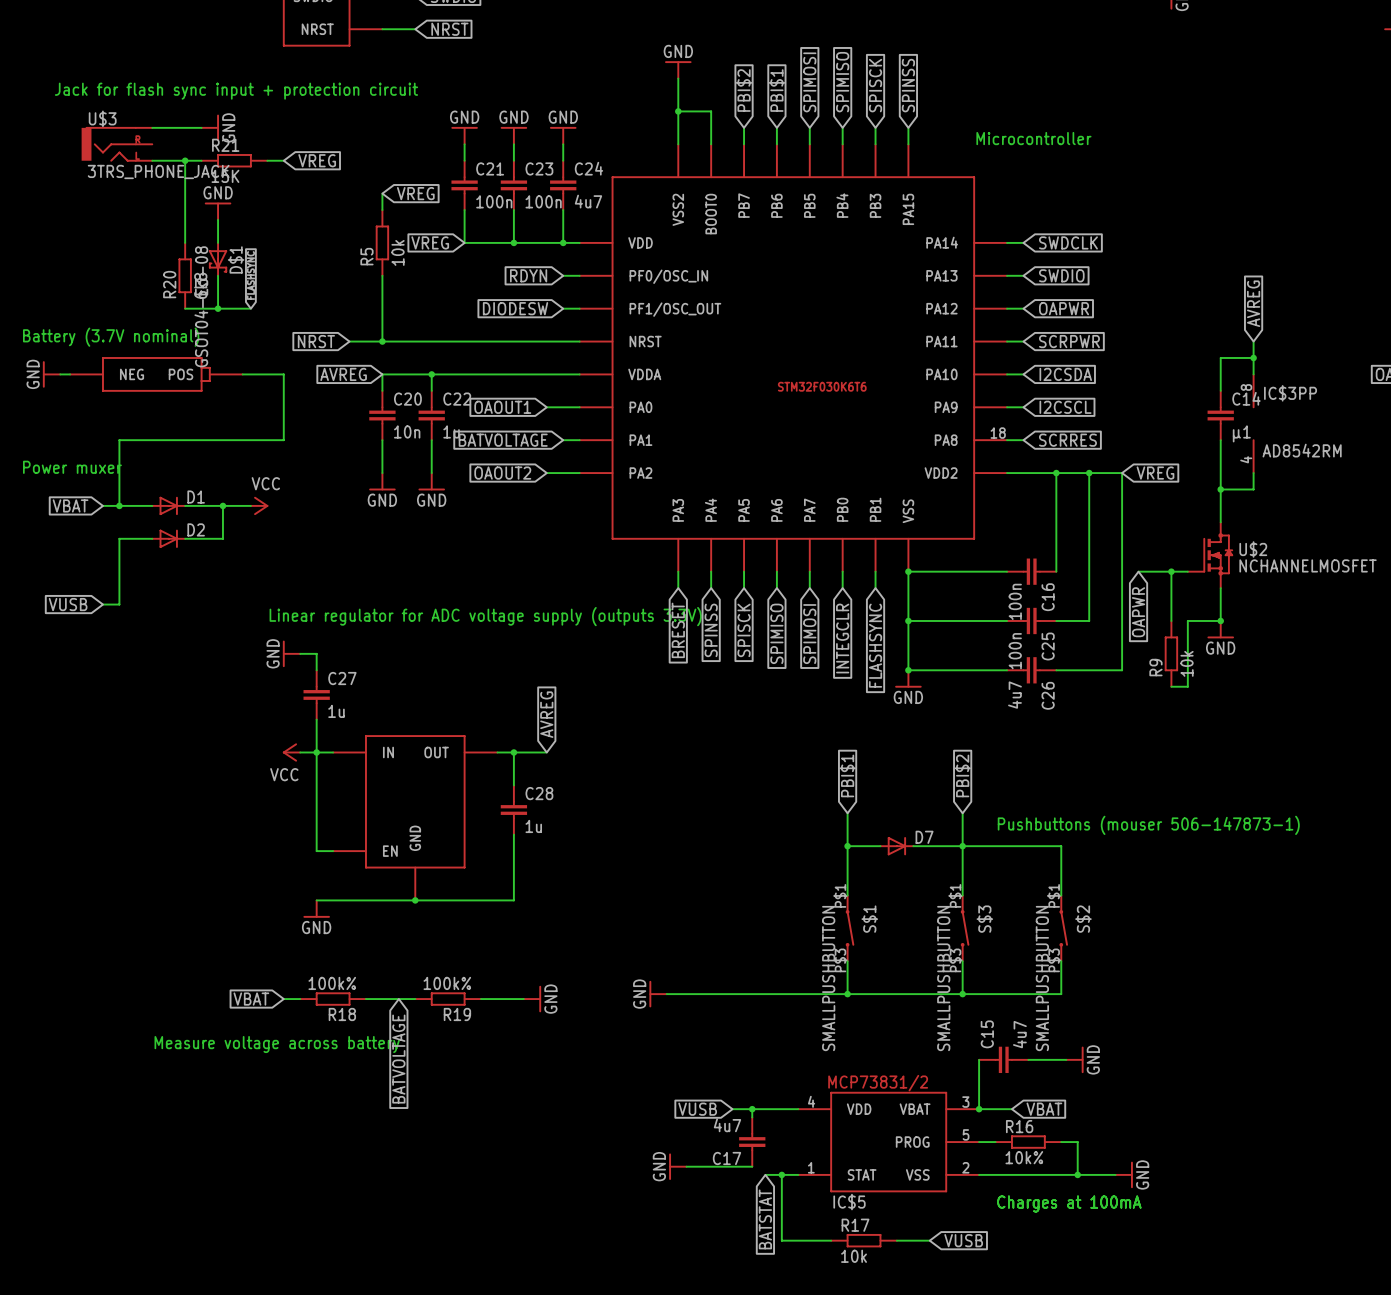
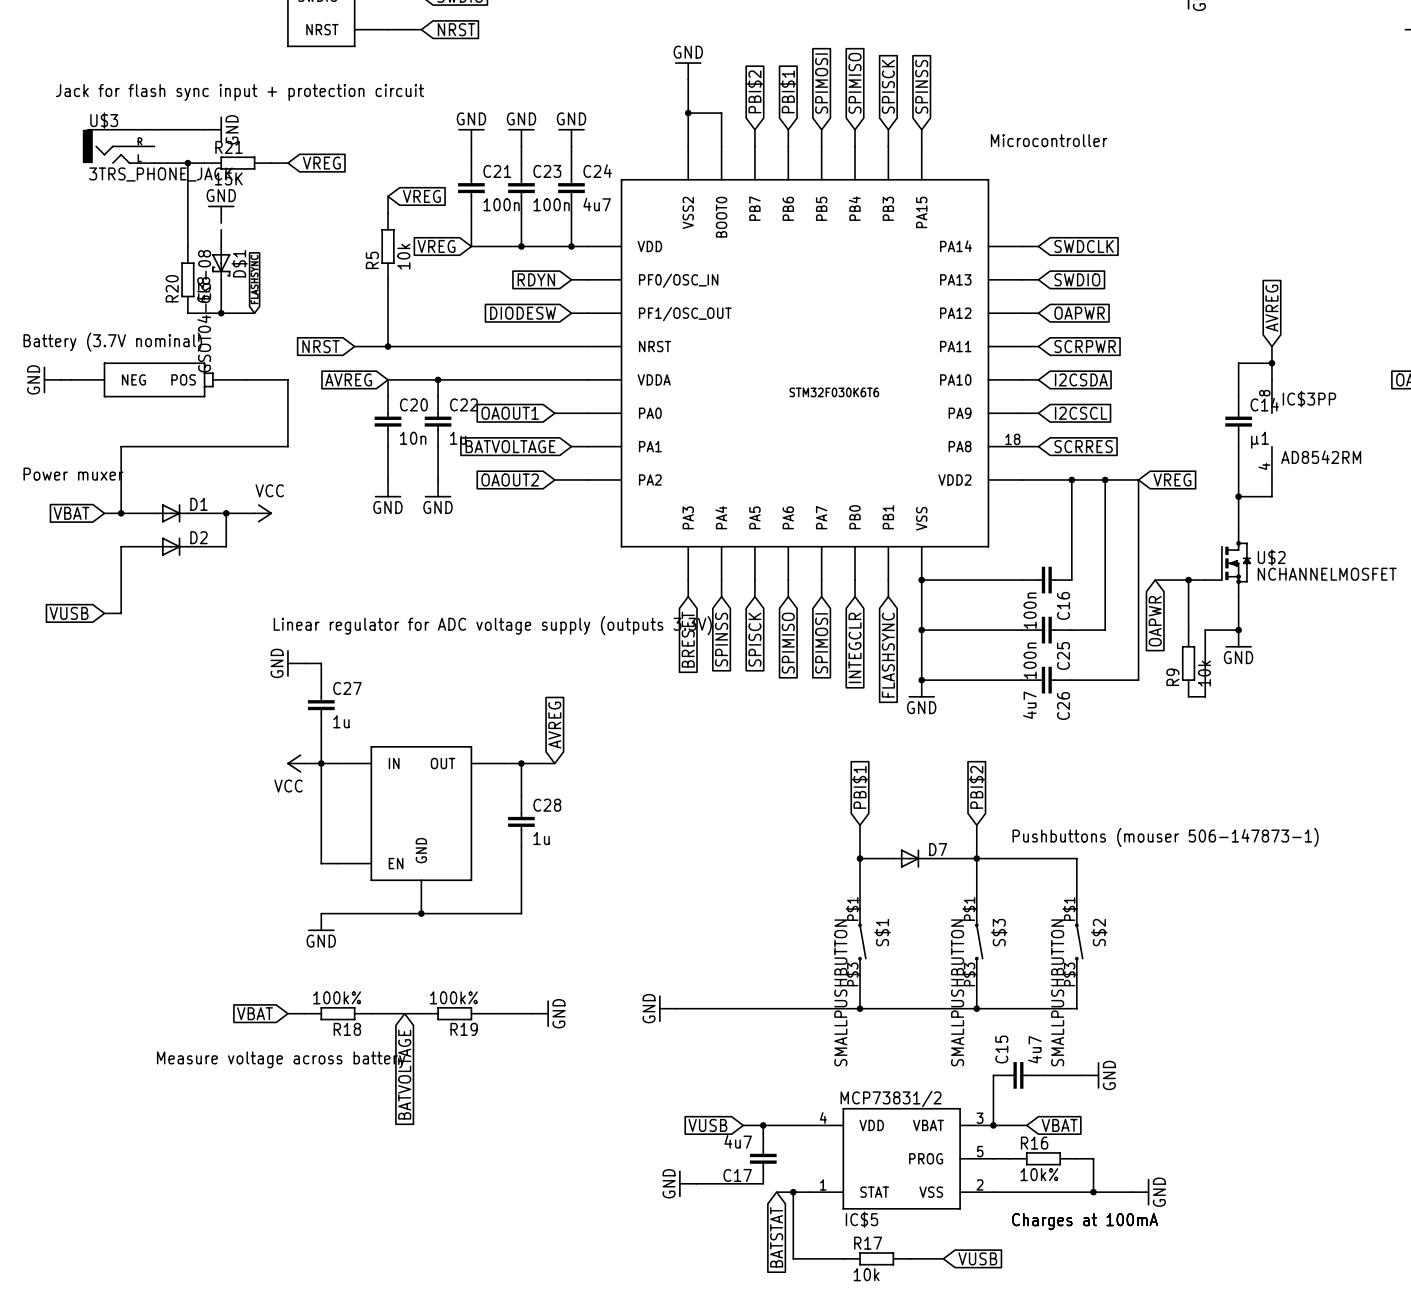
wire: (218, 219) (218, 226) -> none

